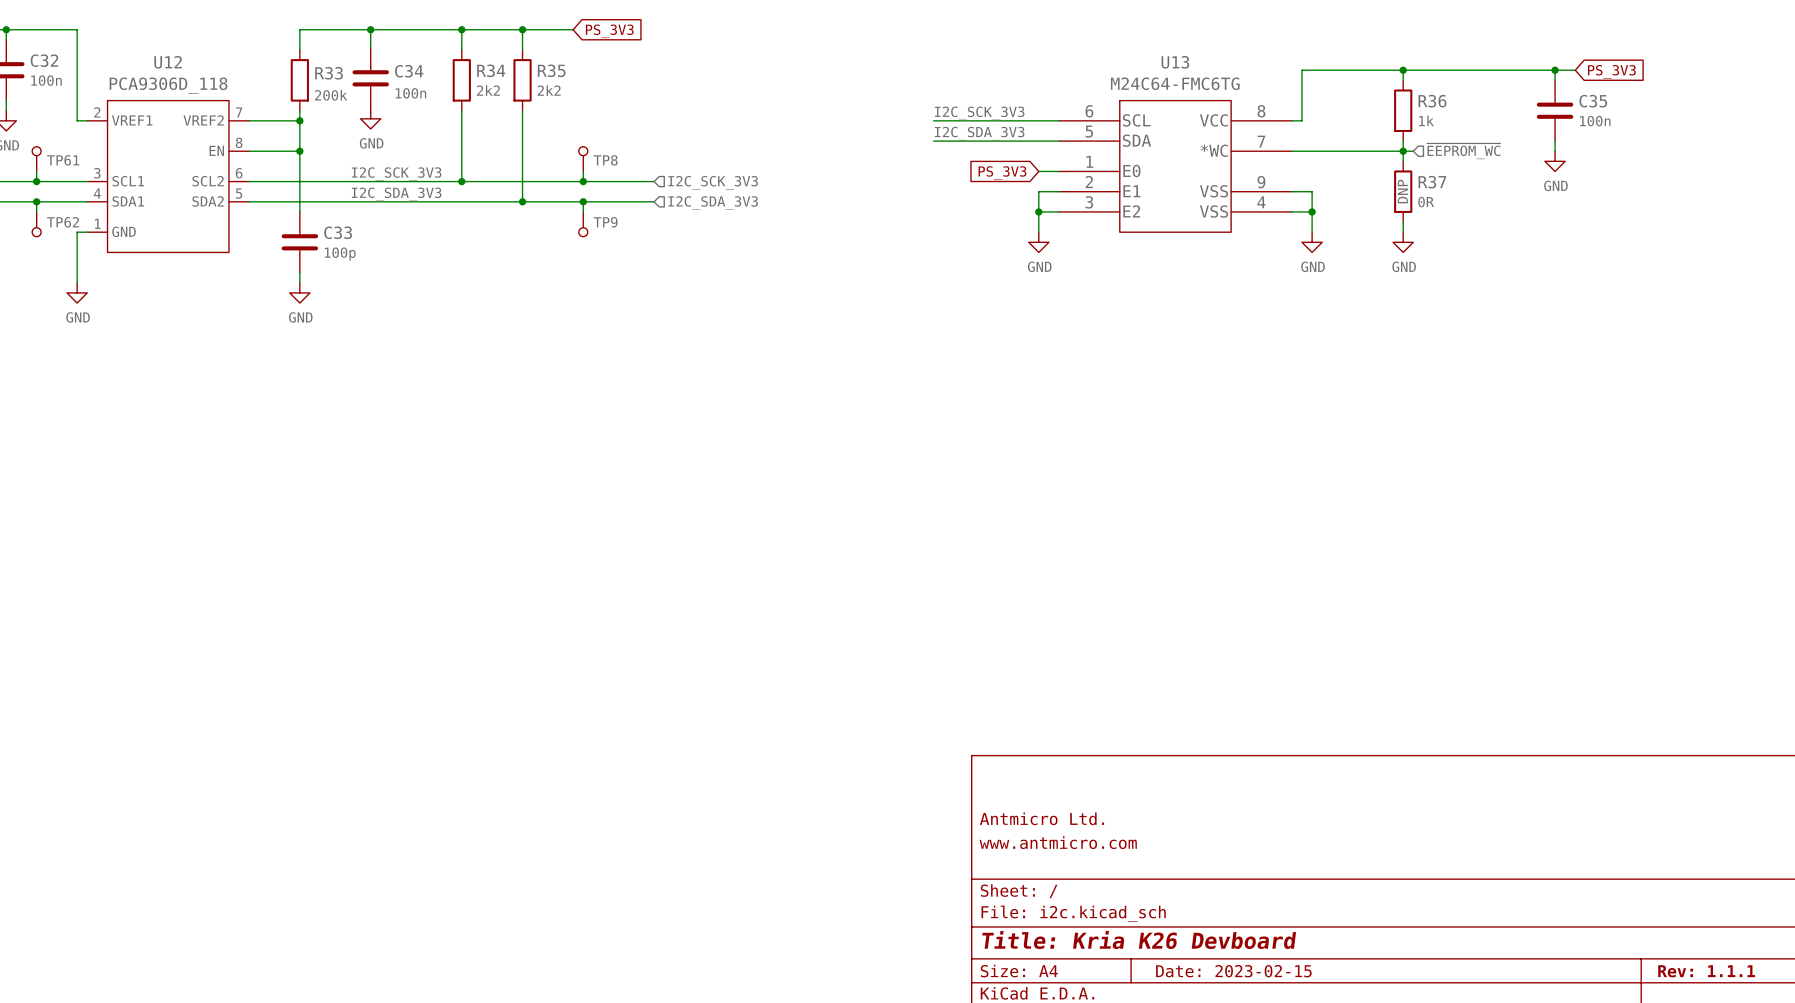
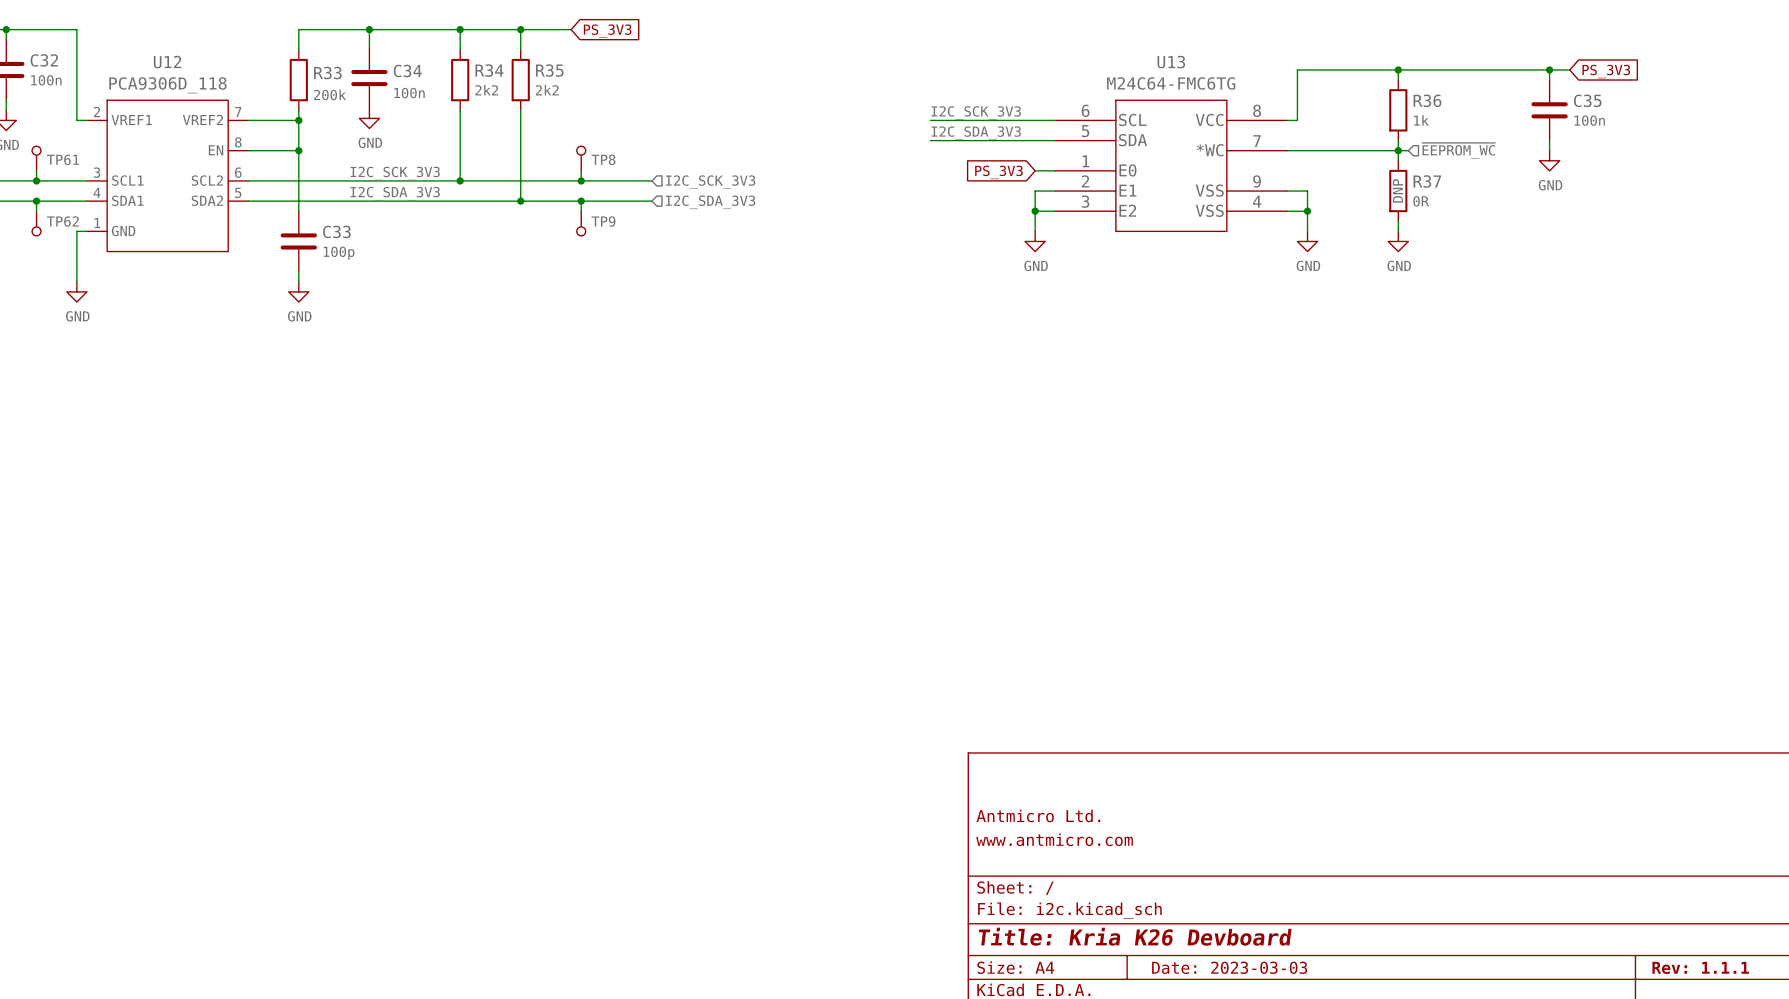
title block: Date: 2023-02-15 (1233, 971) -> Date: 2023-03-03 (1229, 967)

